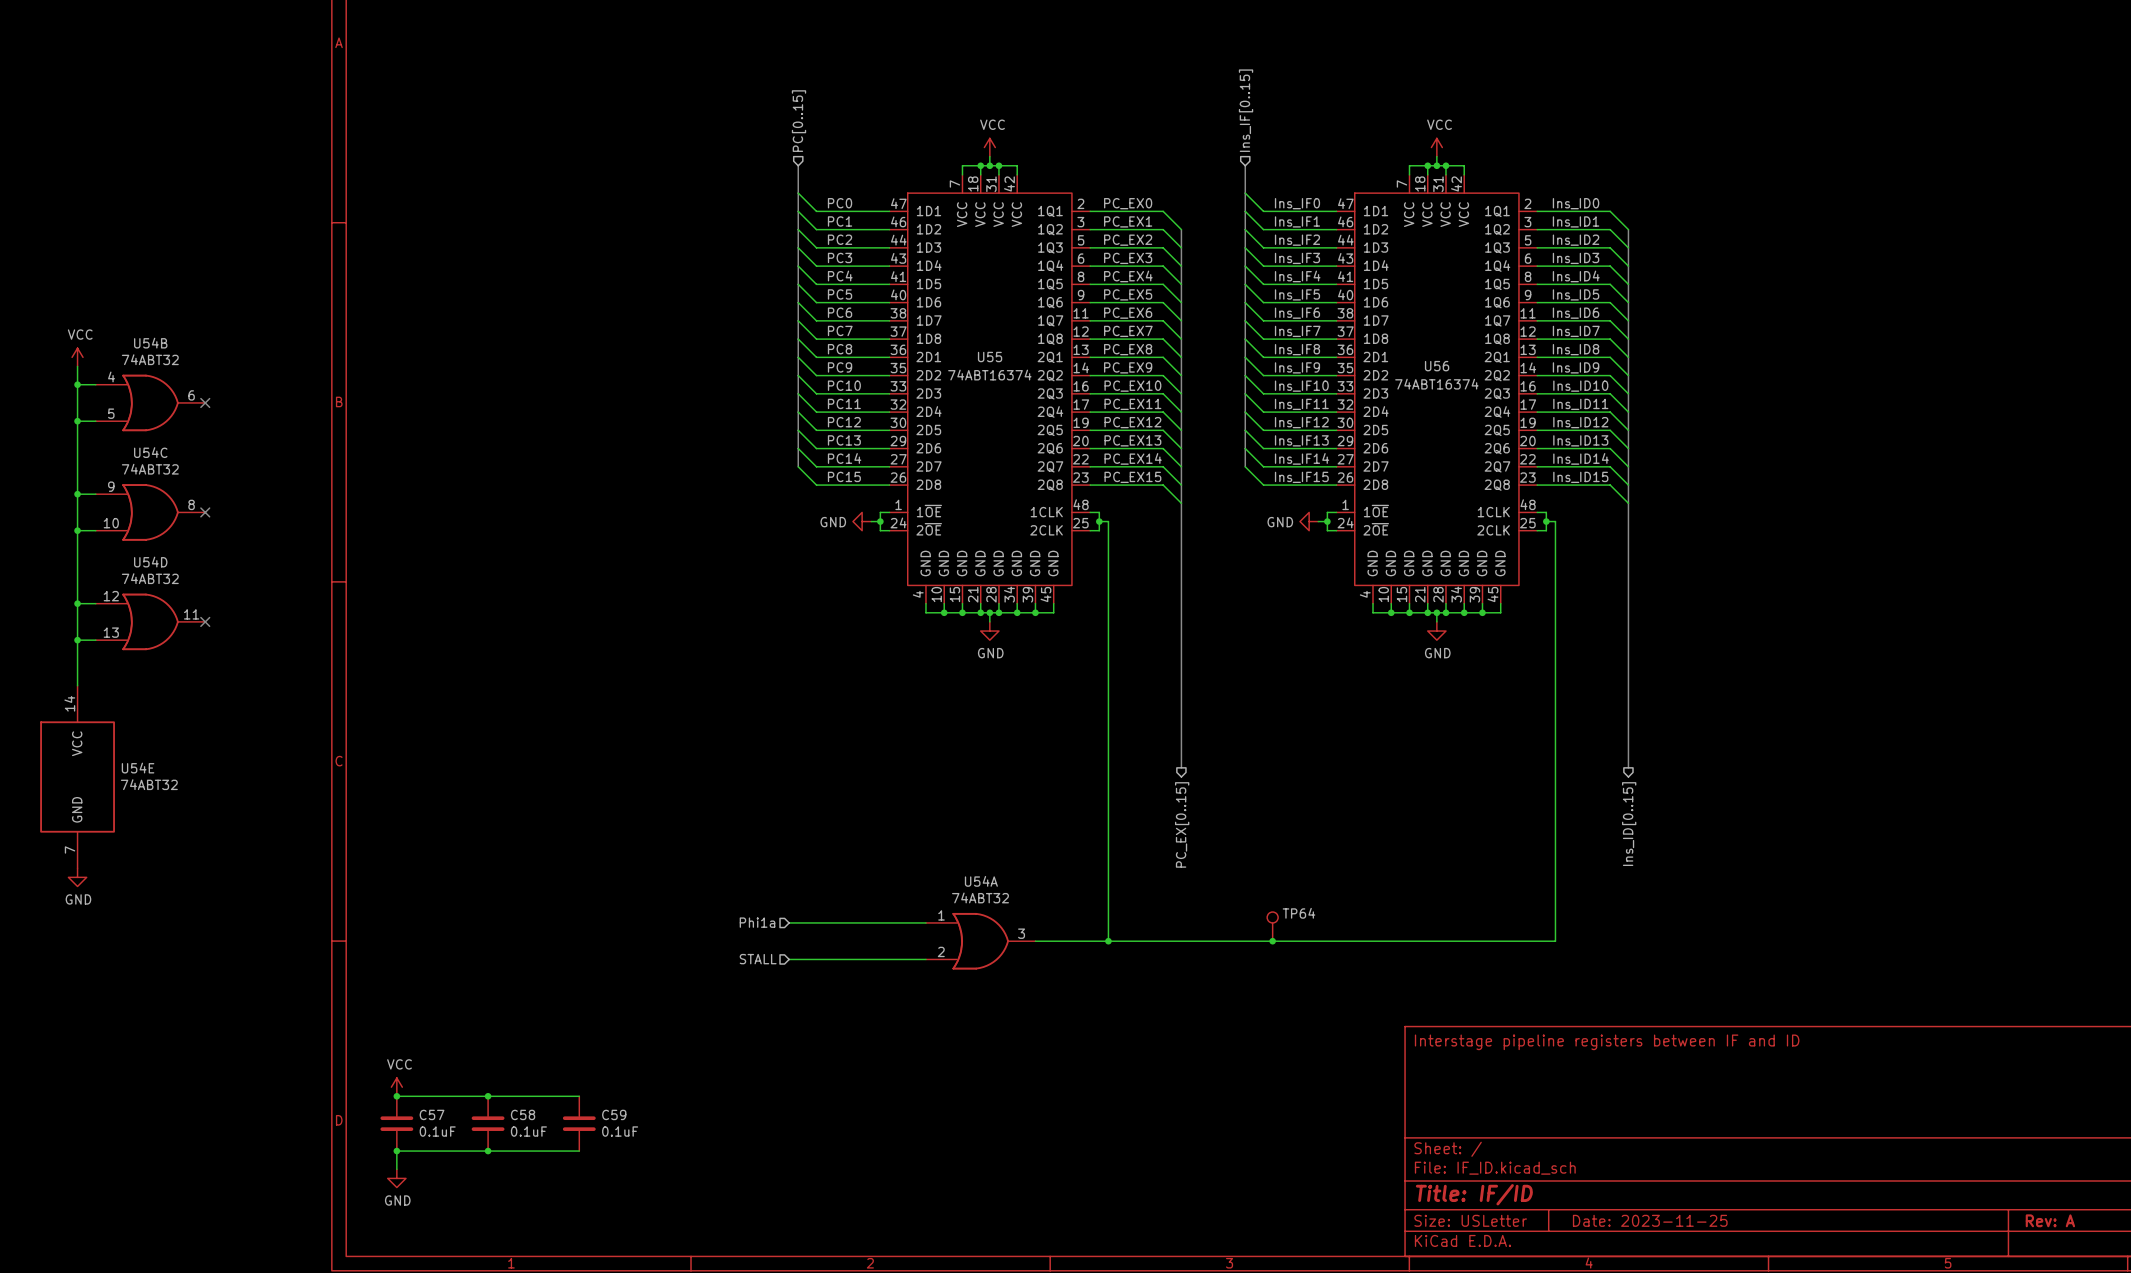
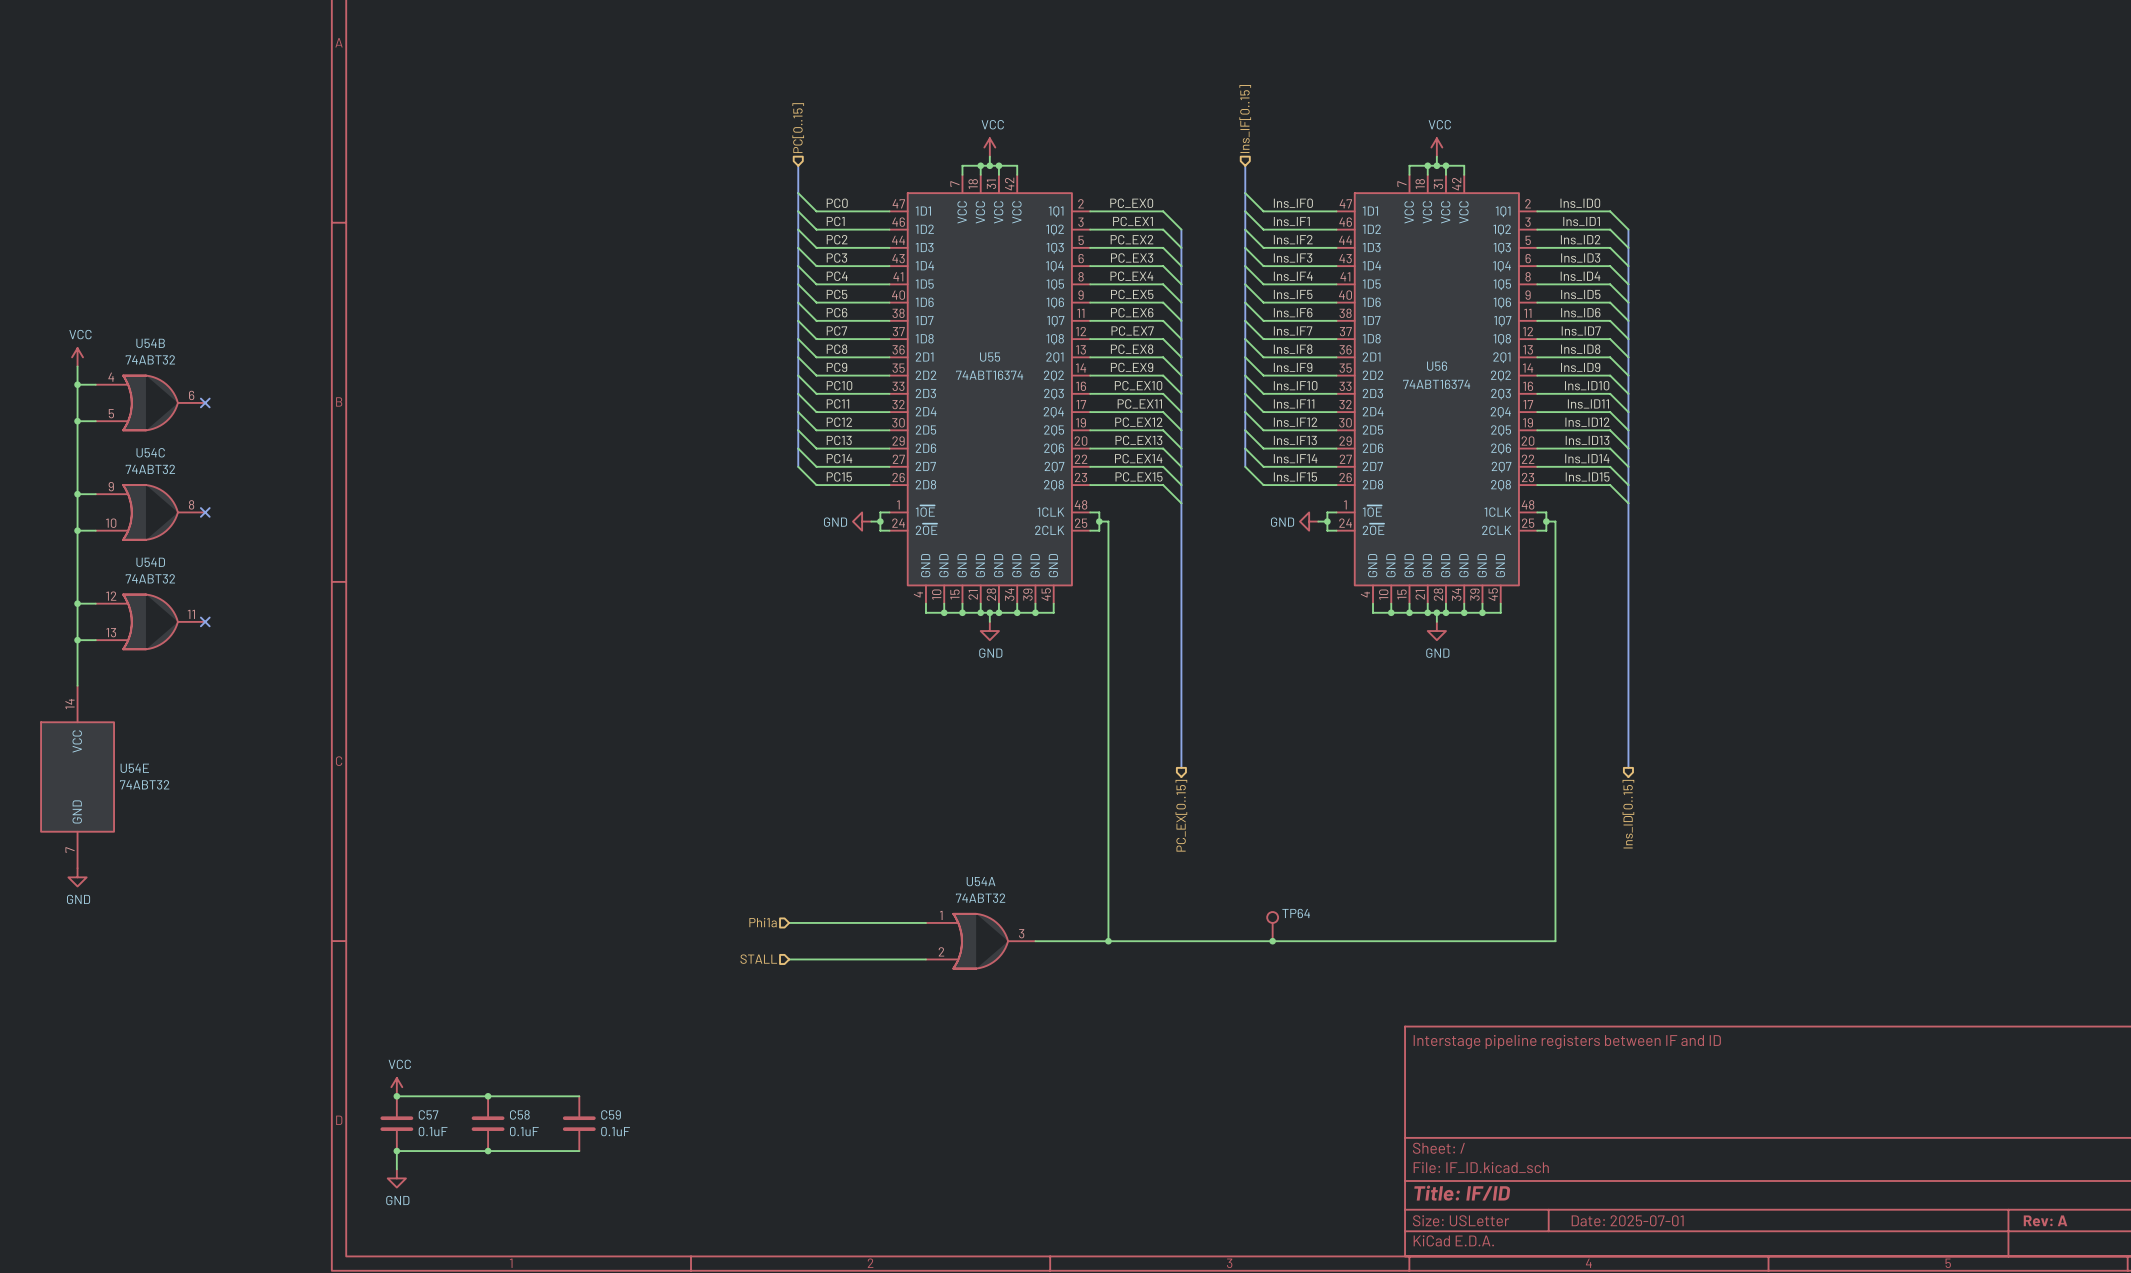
title block: Date: 2023-11-25 (1650, 1220) -> Date: 2025-07-01 (1627, 1220)

